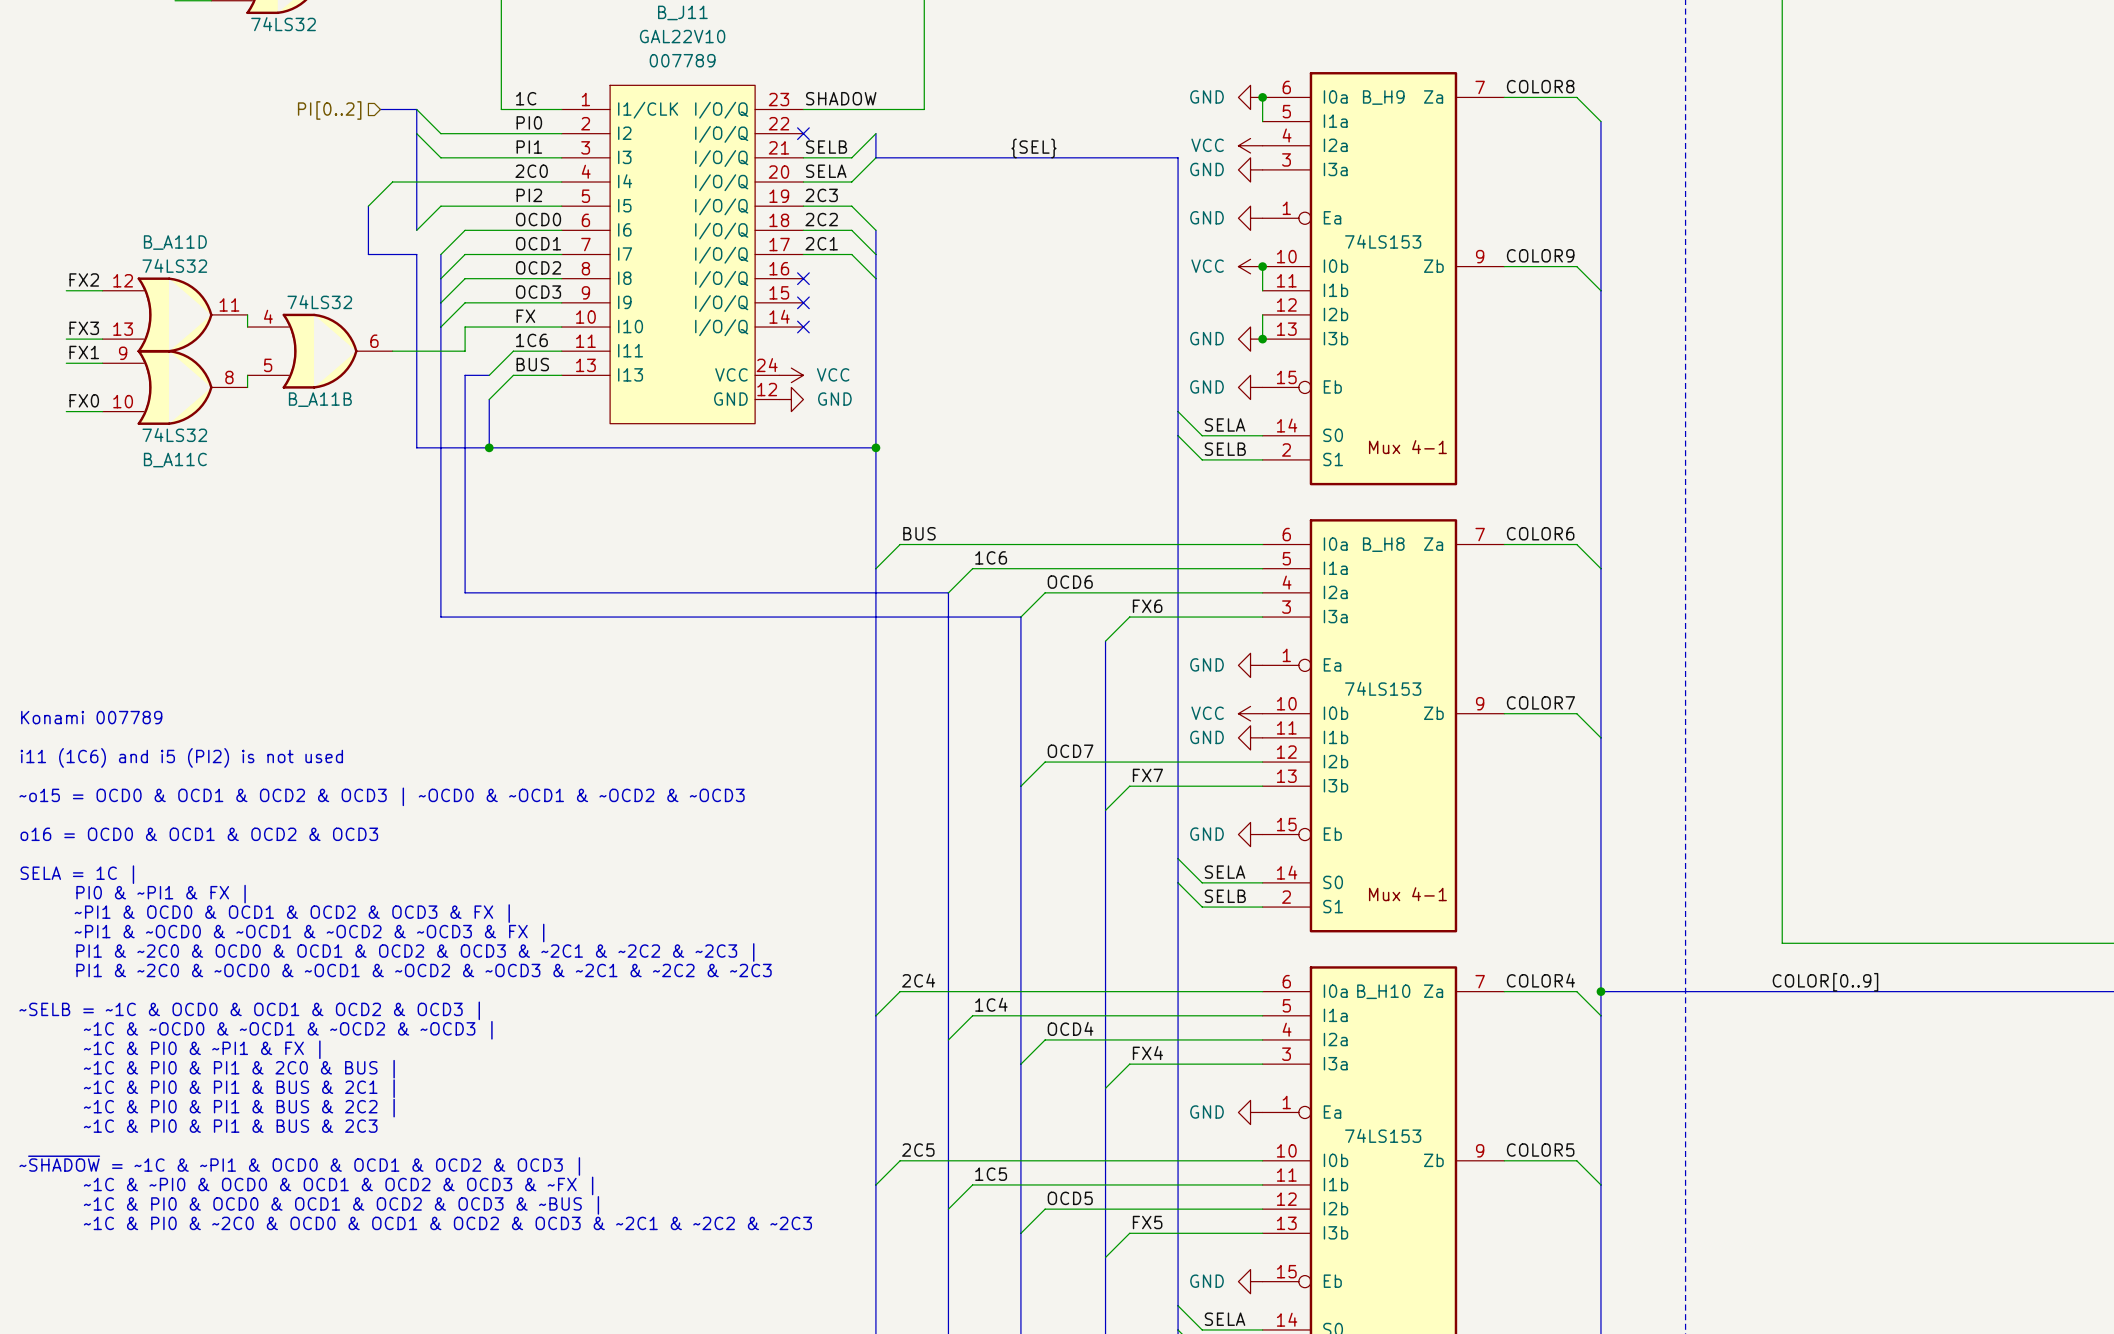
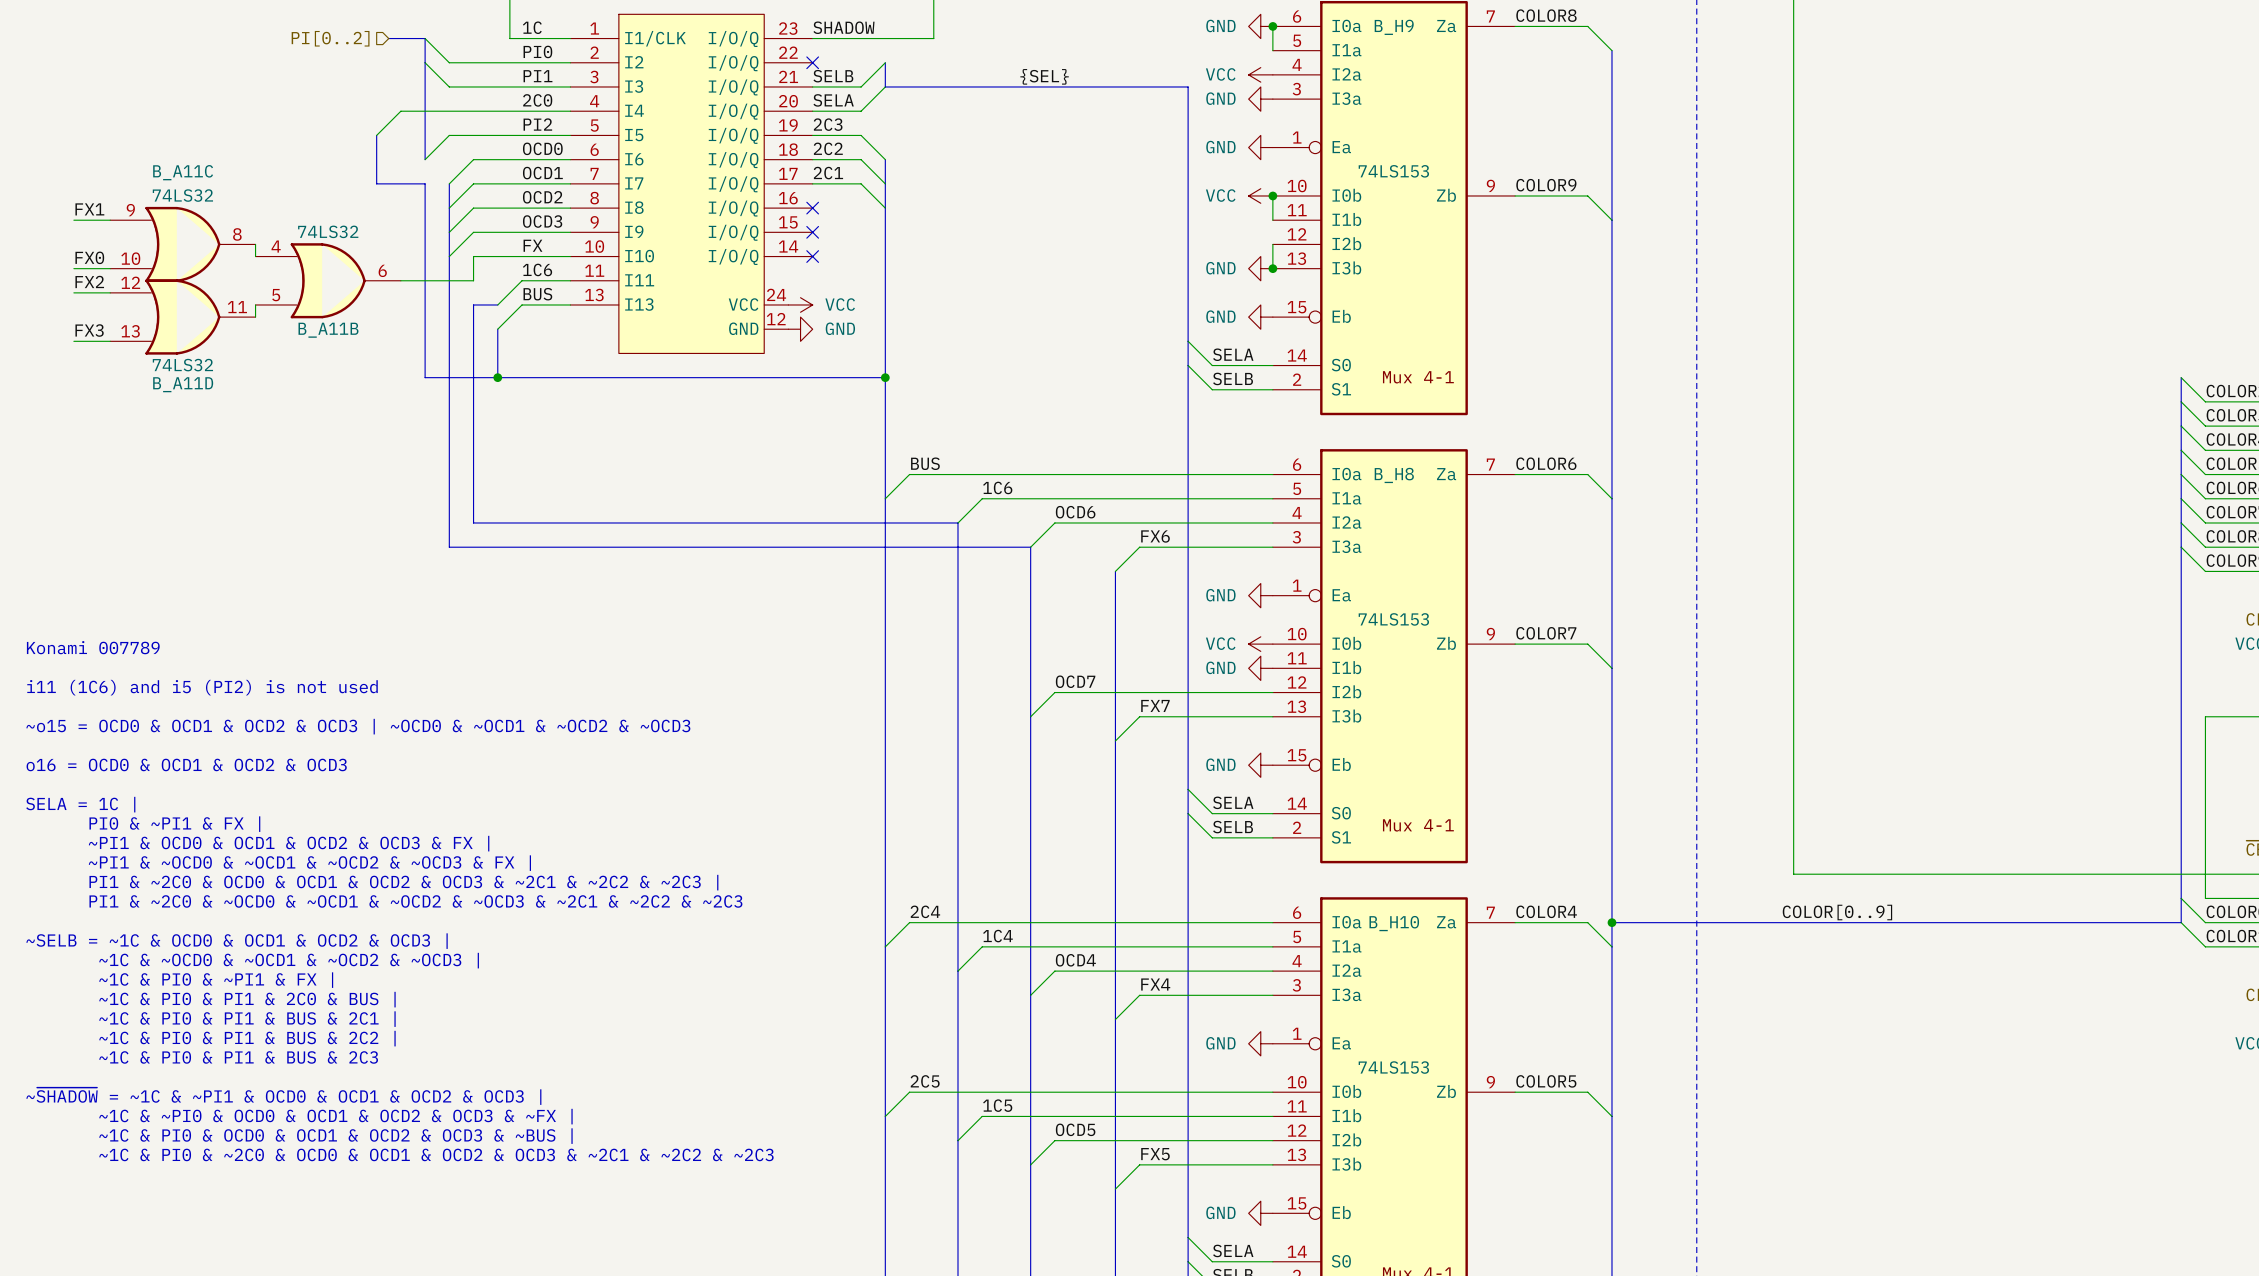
B_A11D name position: B_A11D (175, 242) -> B_A11D (183, 384)
label: FX2 (84, 279) -> FX1 (89, 209)
B_A11D position: (175, 314) -> (182, 317)
label: FX3 (84, 328) -> FX0 (89, 257)
label: FX1 (84, 352) -> FX2 (89, 281)
B_A11C position: (175, 387) -> (182, 244)
label: FX0 (84, 400) -> FX3 (89, 330)
B_A11C name position: B_A11C (175, 460) -> B_A11C (183, 172)

